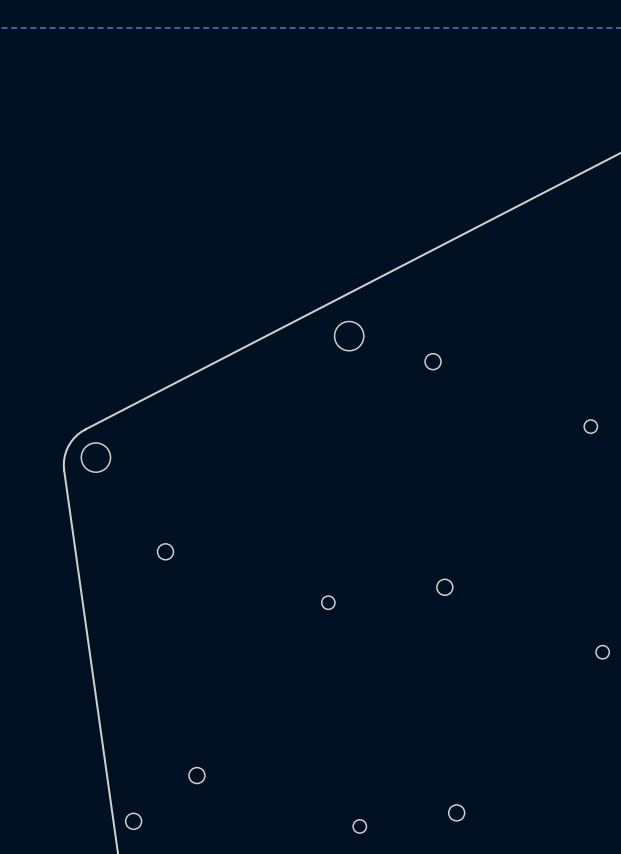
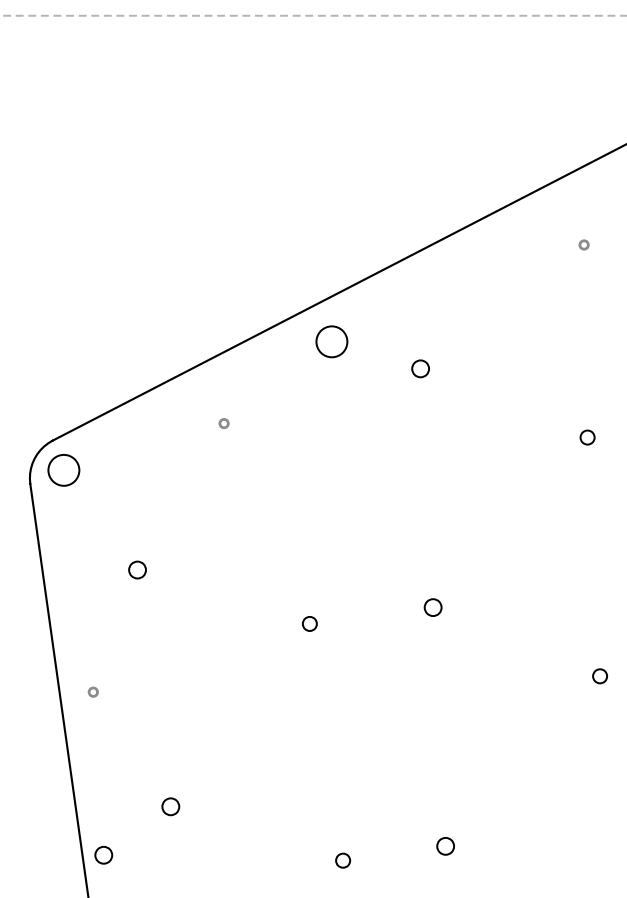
via: none -> (584, 244)
via: none -> (224, 423)
via: none -> (93, 692)

